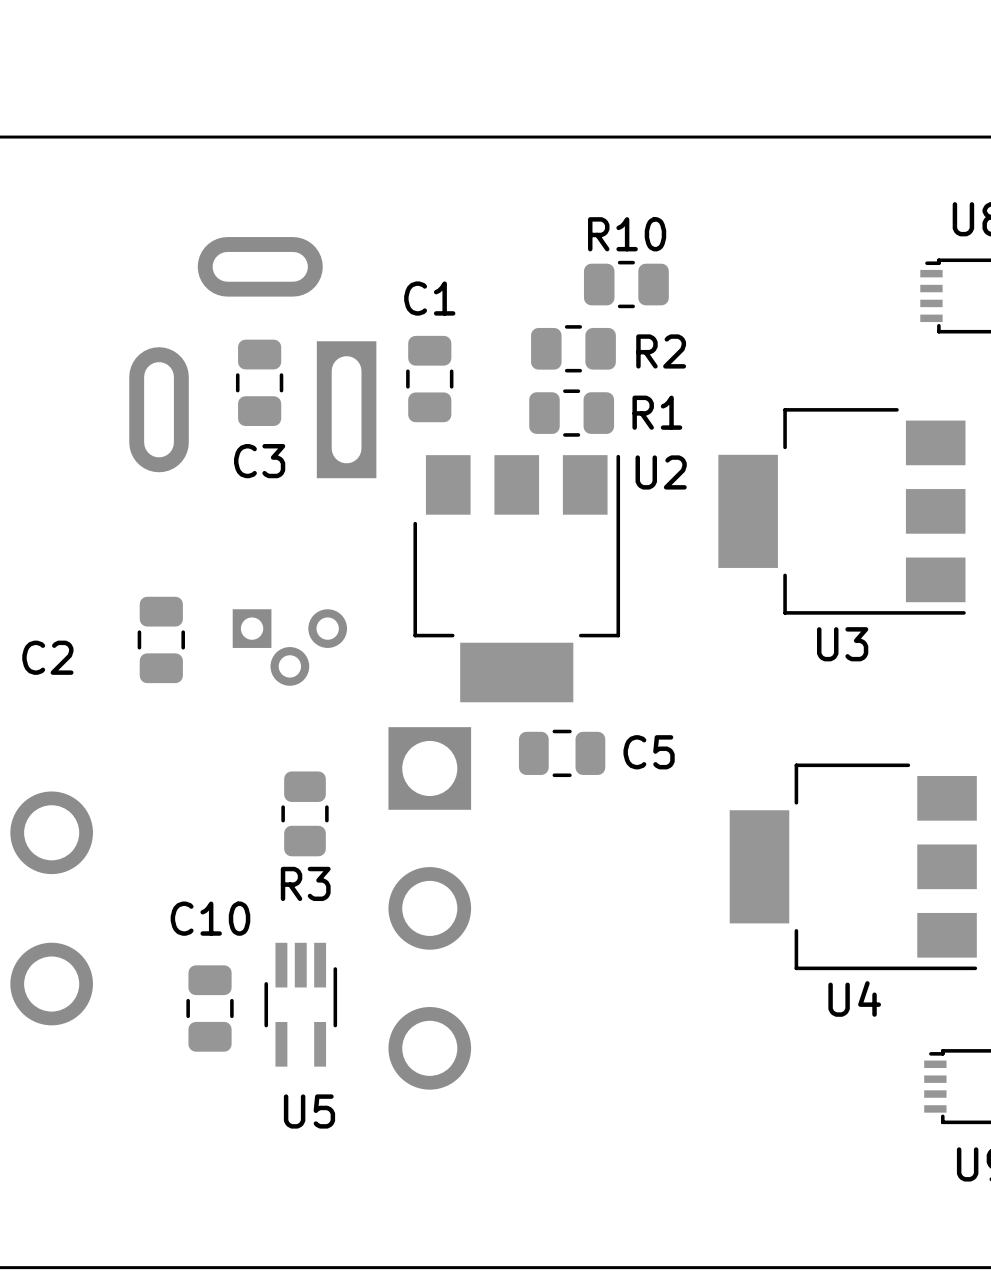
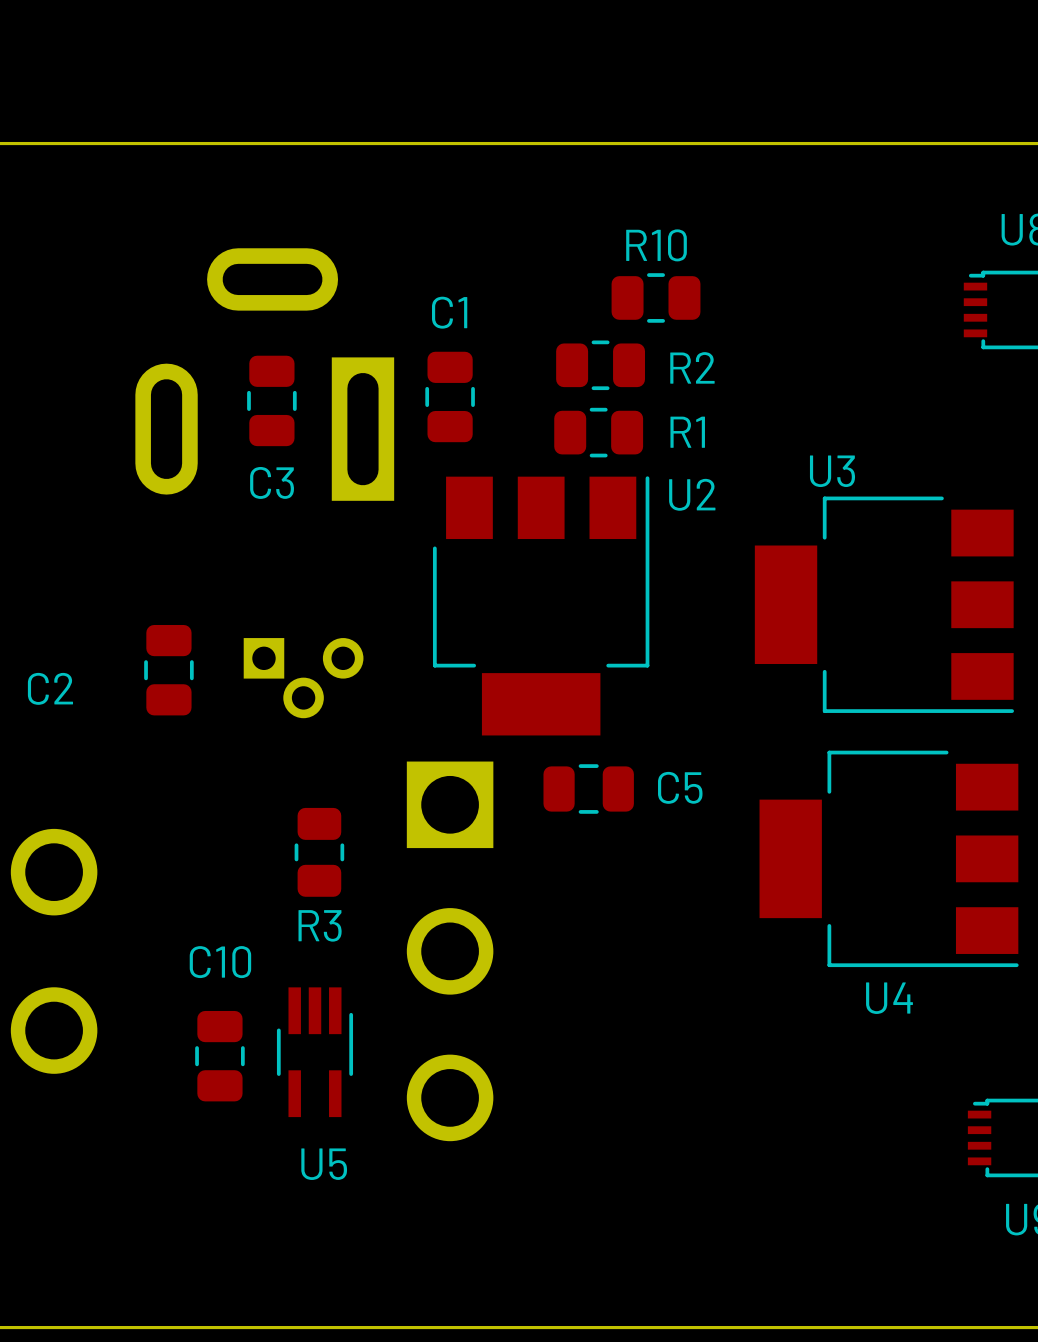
U3 position: (842, 511) -> (884, 604)
U3 name position: U3 (842, 644) -> U3 (832, 471)
U4 position: (853, 866) -> (889, 858)

